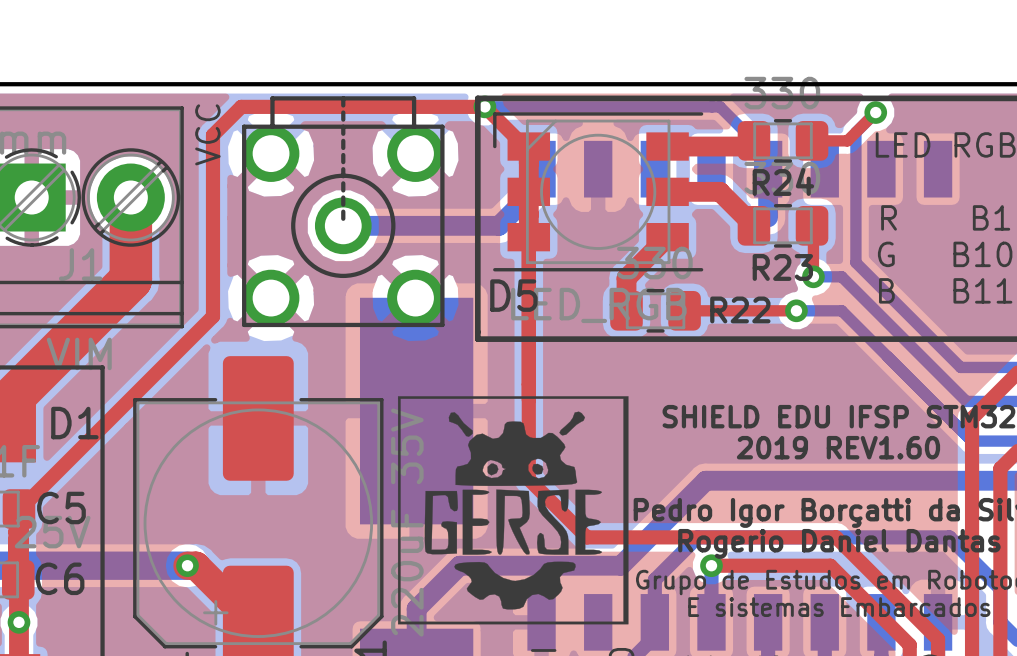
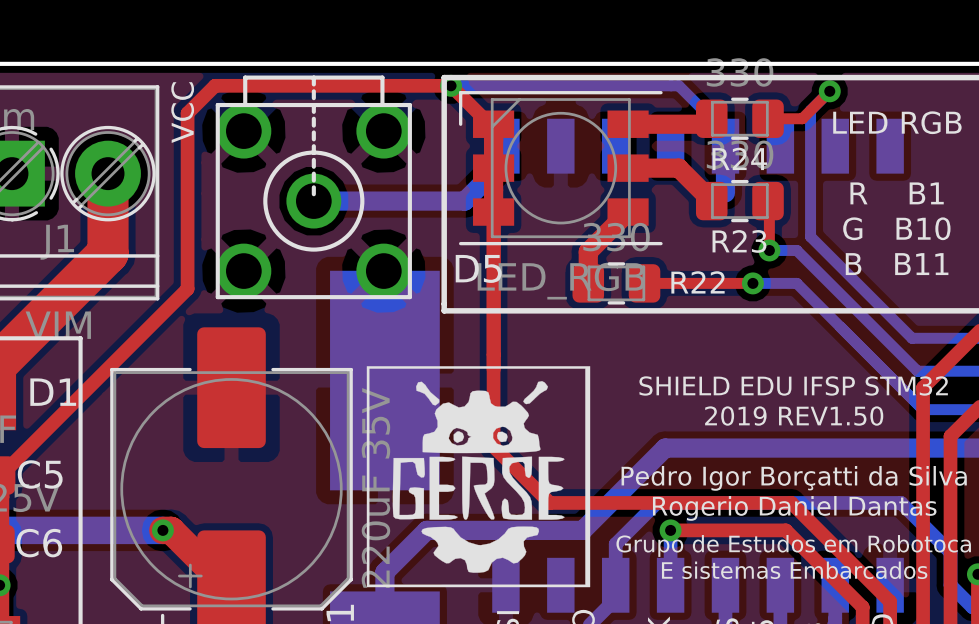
text: 2019 REV1.60 (838, 447) -> 2019 REV1.50 (794, 416)

